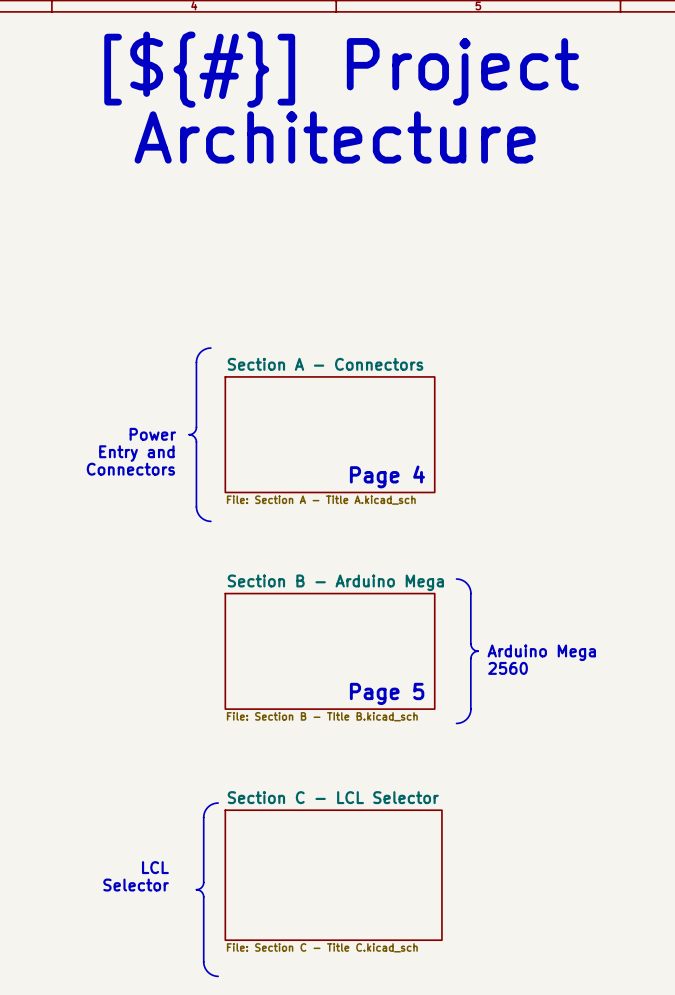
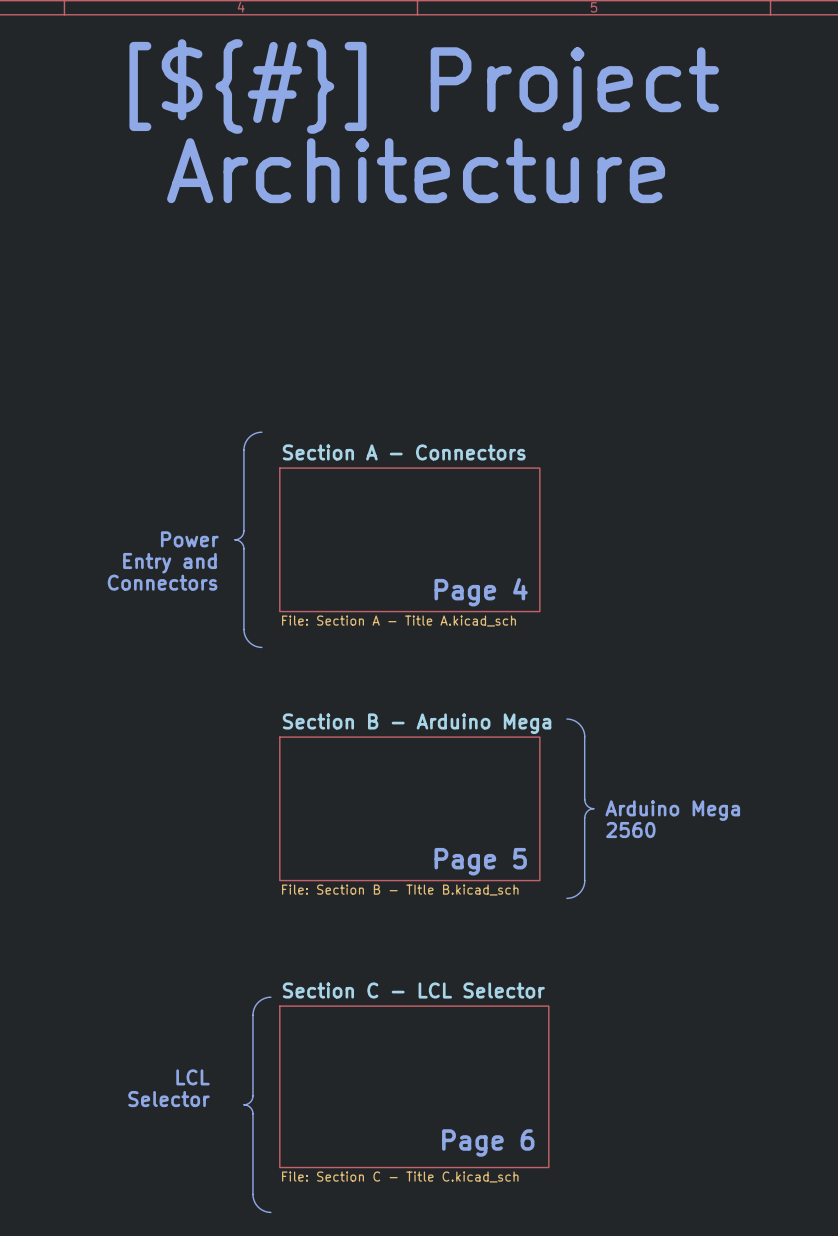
text: none -> Page 6 (488, 1142)

